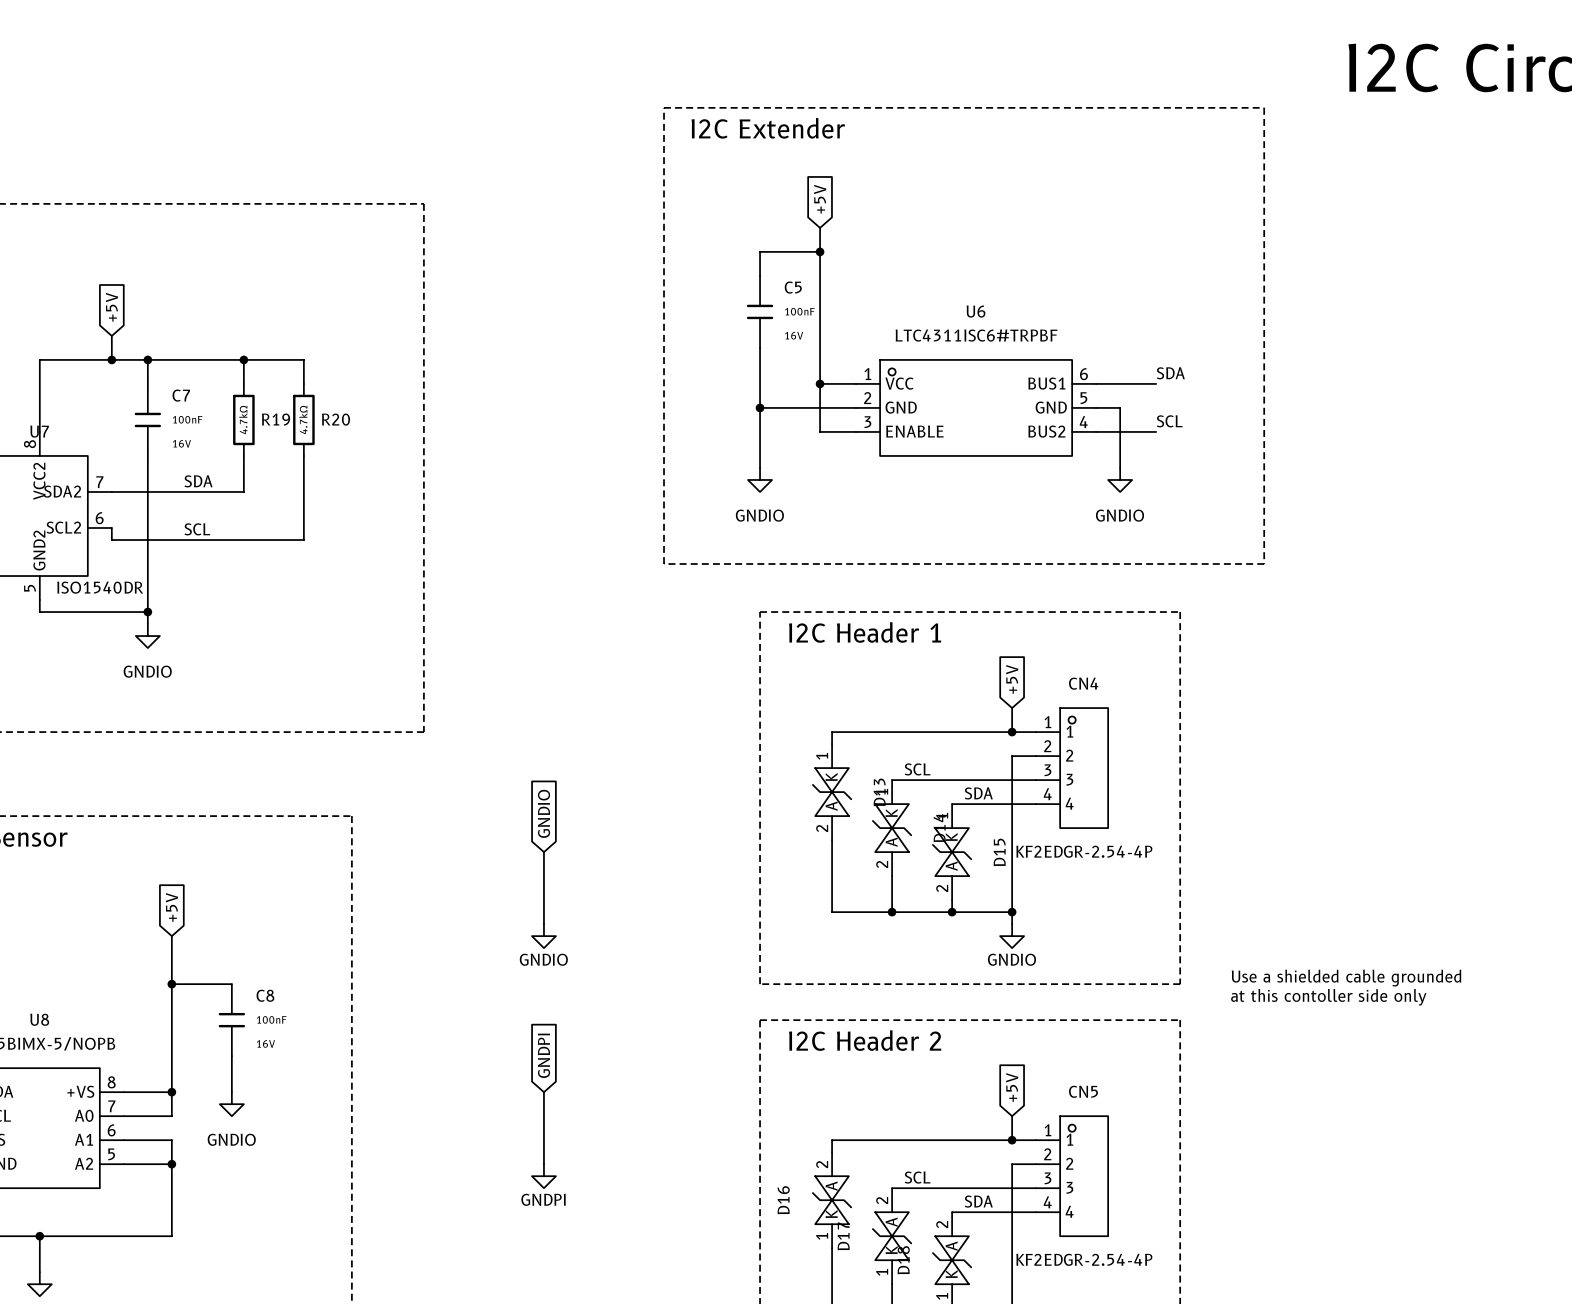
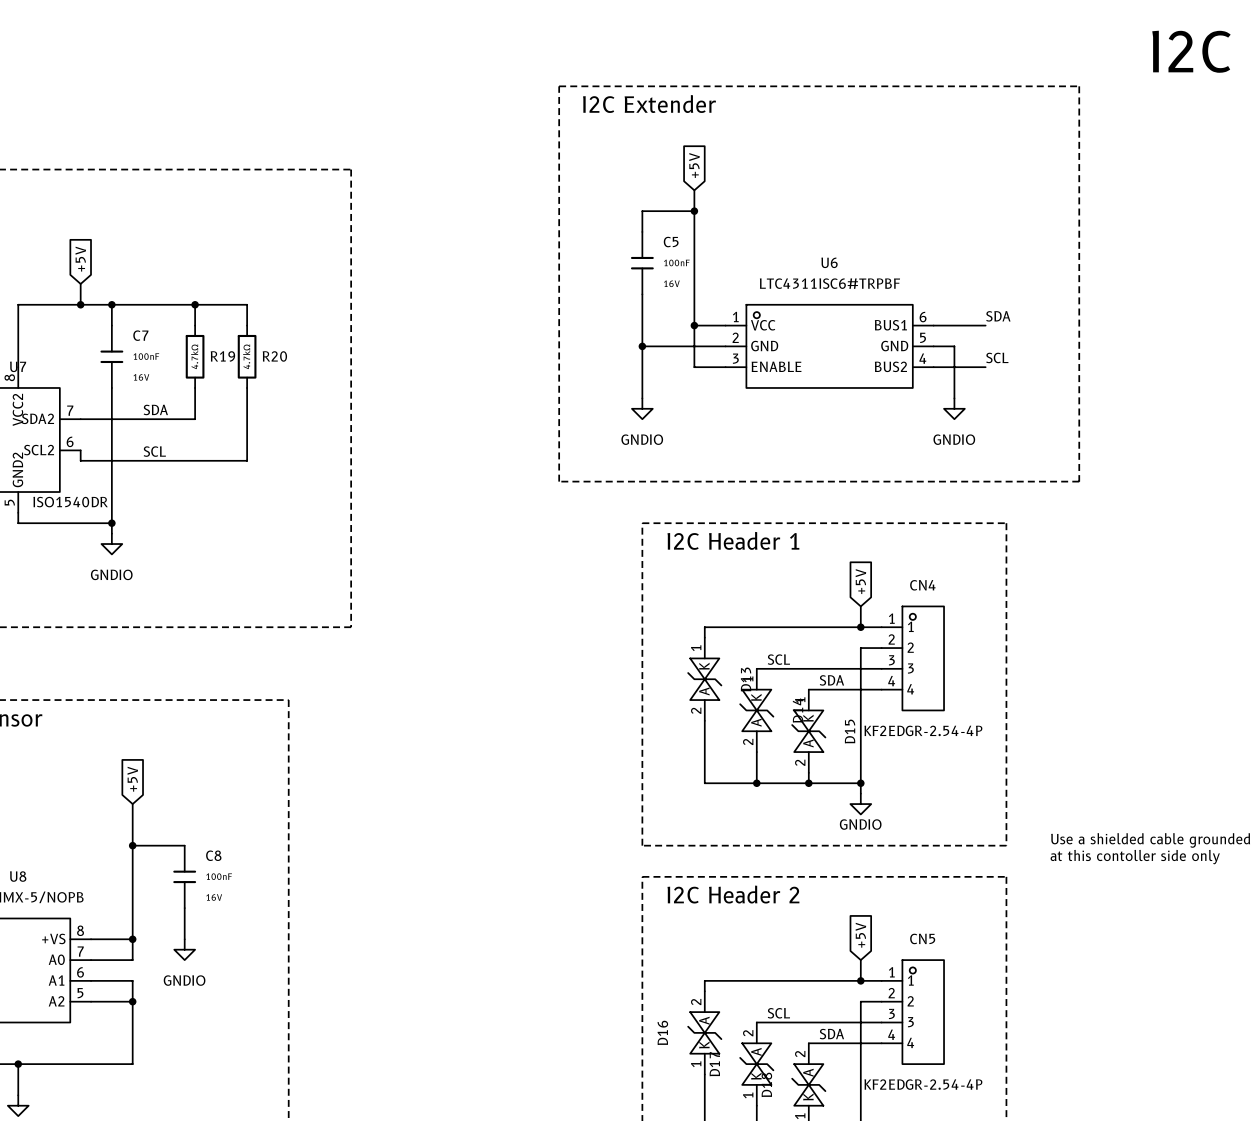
global label: GNDIO (544, 813) -> none
wire: (543, 852) (543, 924) -> none
power symbol: GNDIO (543, 936) -> none
global label: GNDPI (544, 1055) -> none
wire: (543, 1092) (543, 1164) -> none
power symbol: GNDPI (543, 1176) -> none

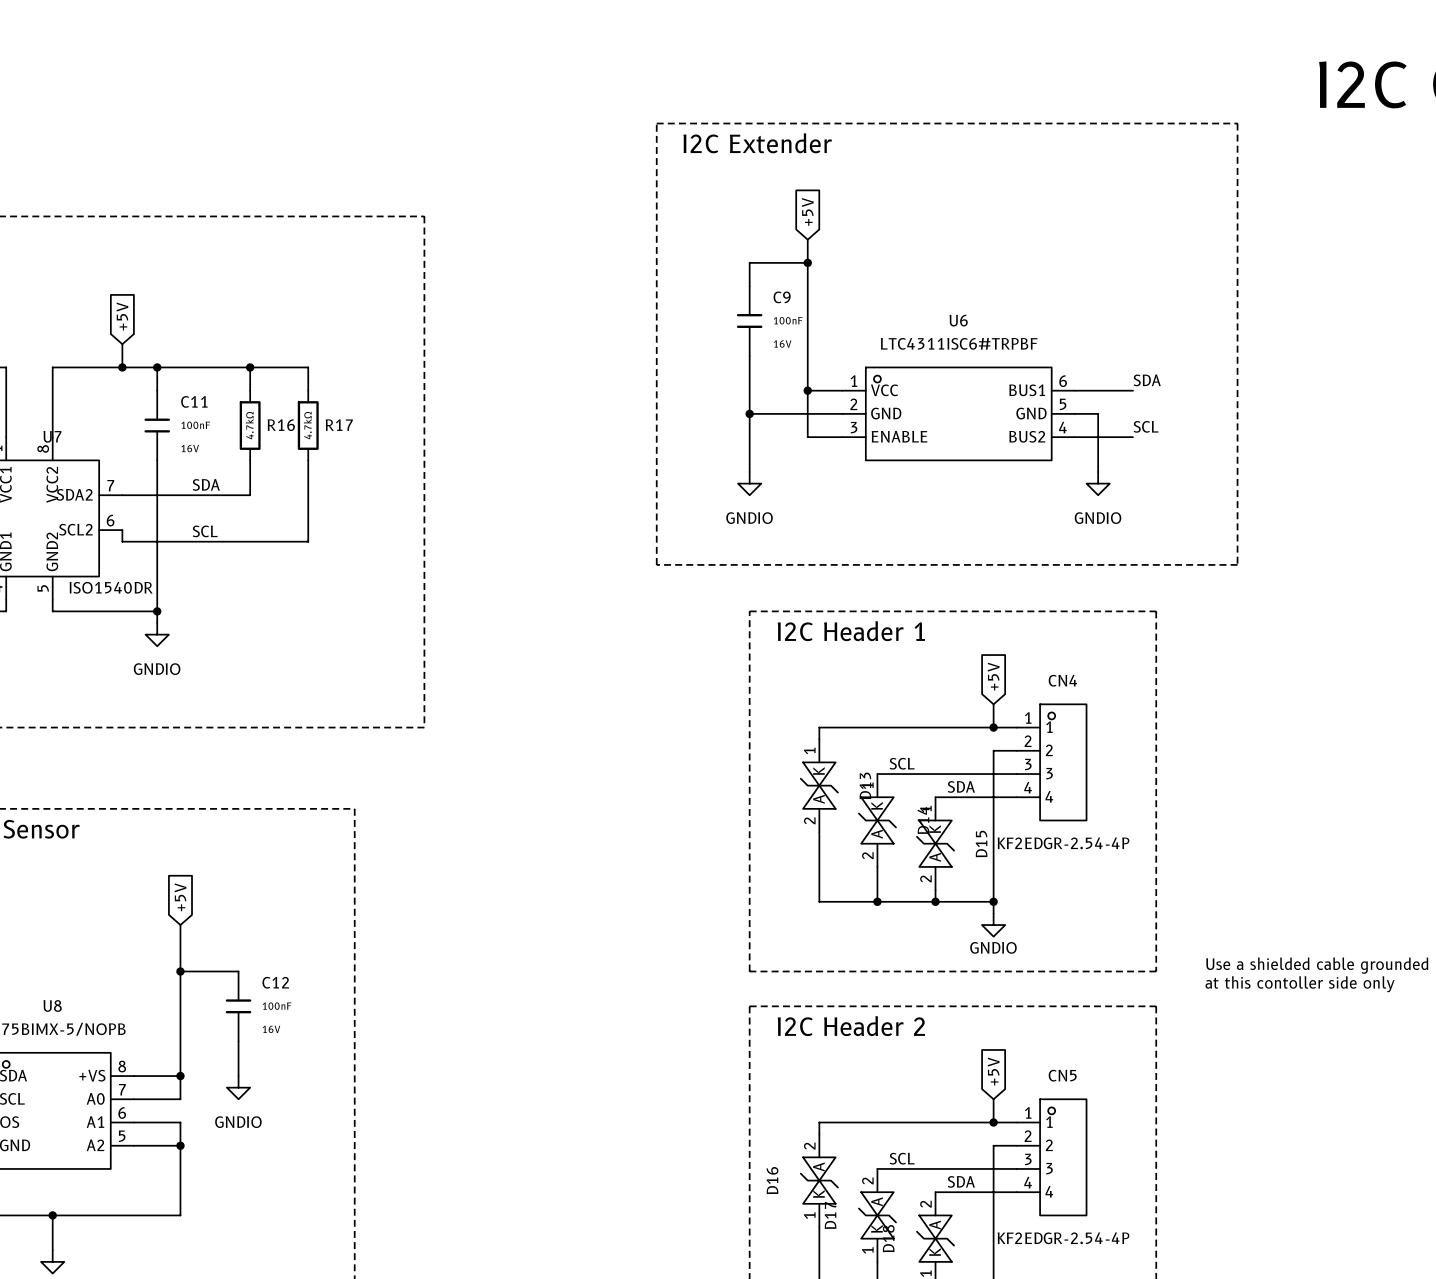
C5 name: C5 (671, 242) -> C9 (782, 297)
C7 name: C7 (140, 335) -> C11 (194, 401)
R19 name: R19 (222, 356) -> R16 (281, 425)
R20 name: R20 (274, 356) -> R17 (339, 425)
C8 name: C8 (213, 855) -> C12 (275, 982)

